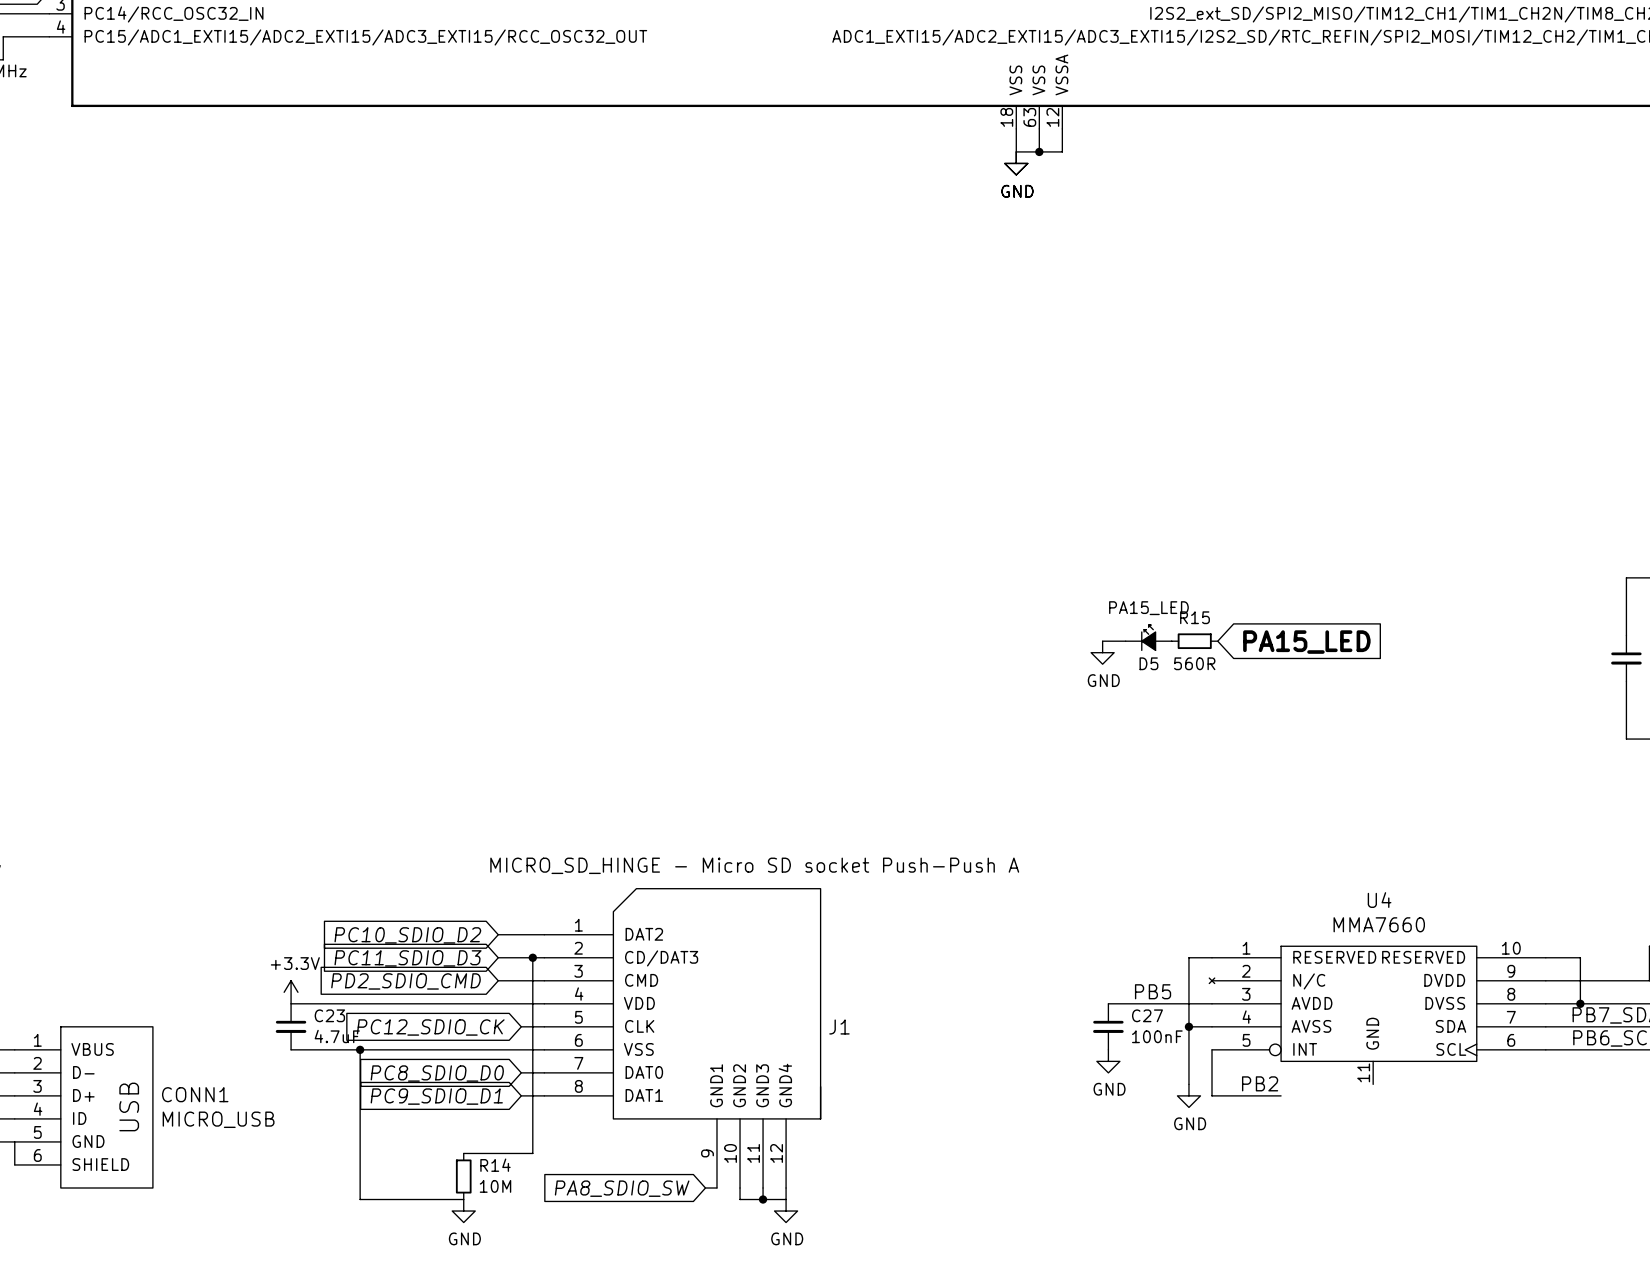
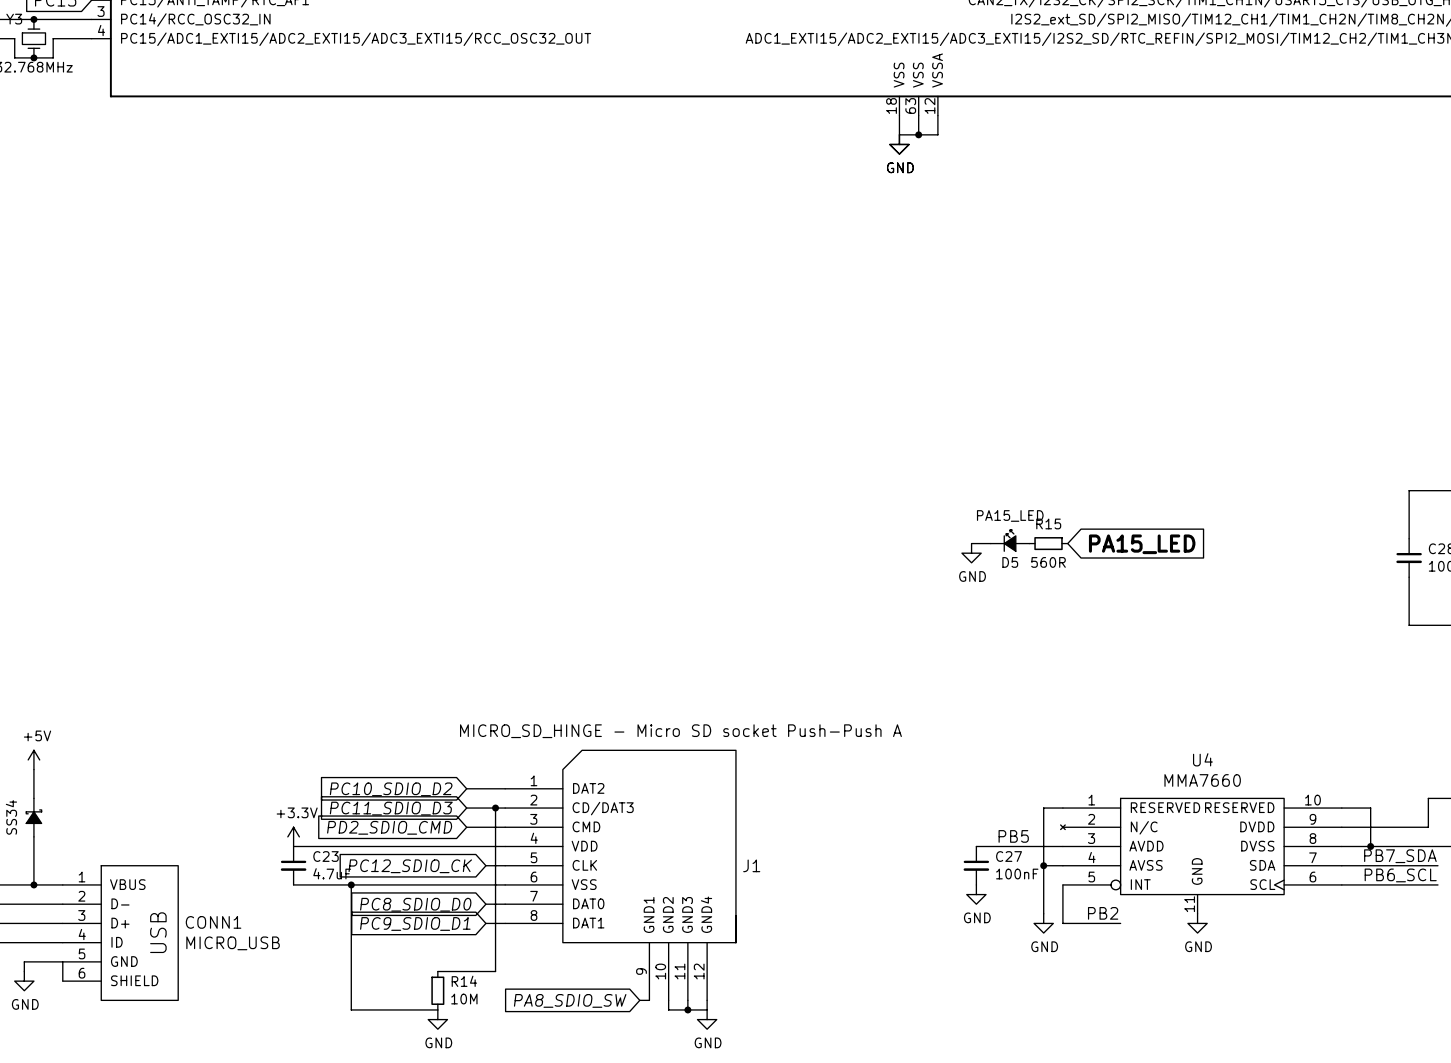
power symbol: none -> GND (1197, 923)

